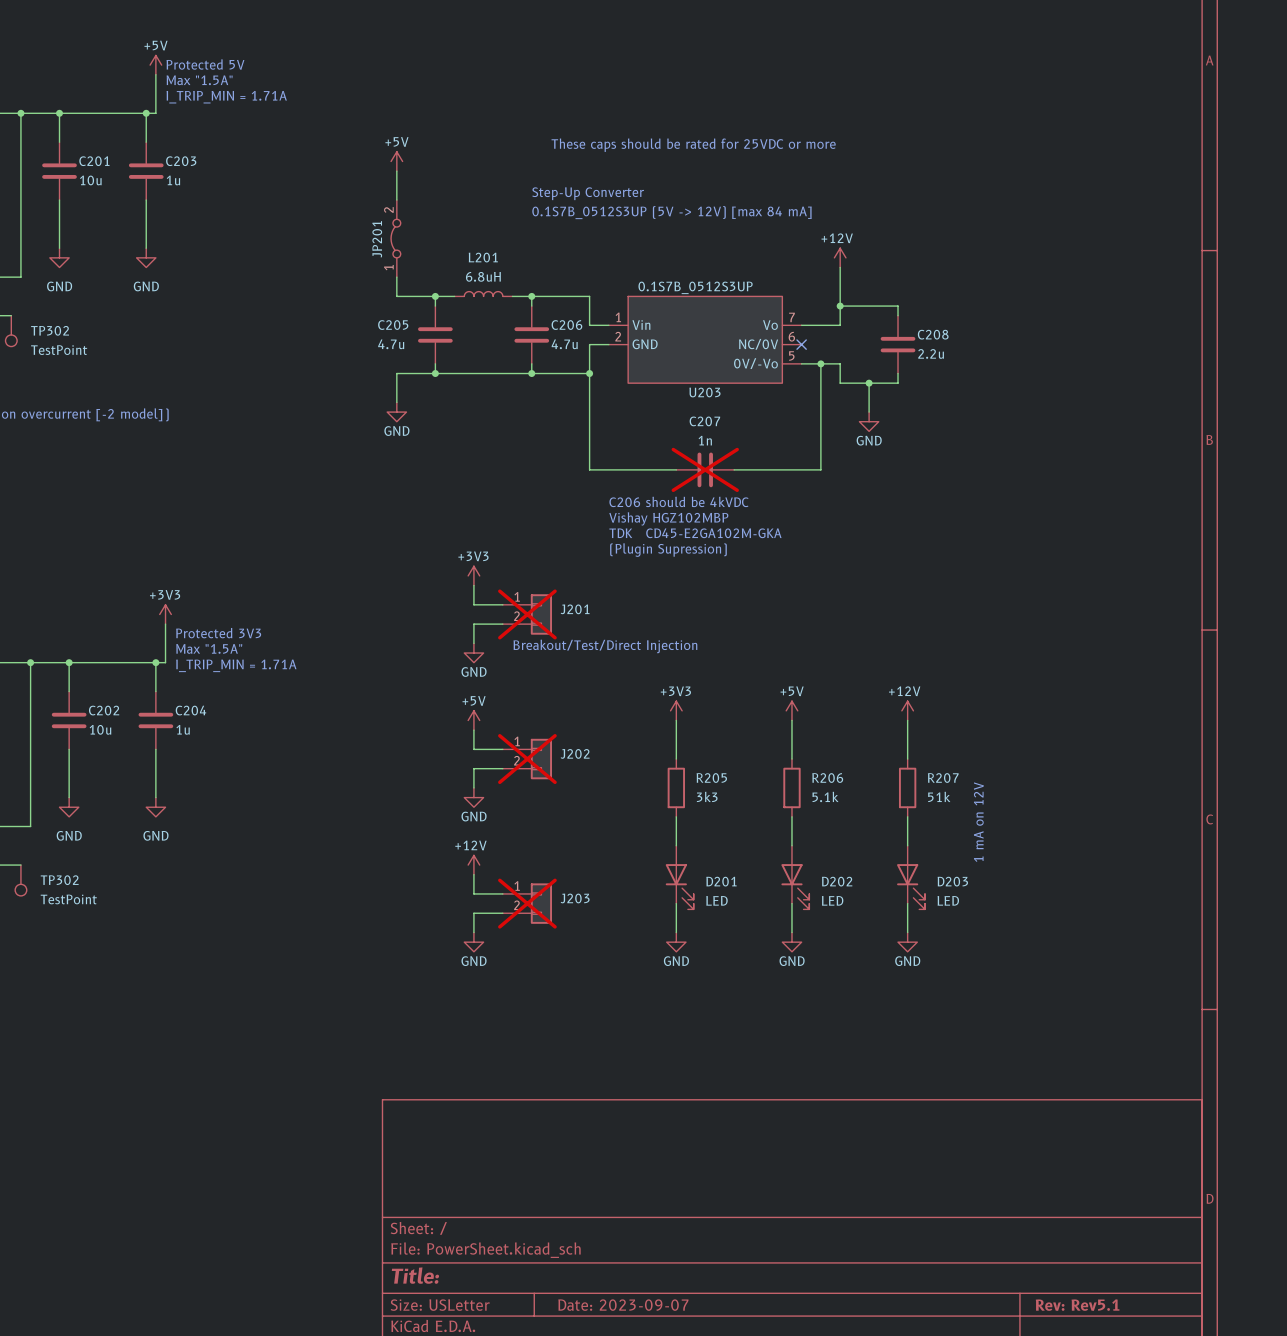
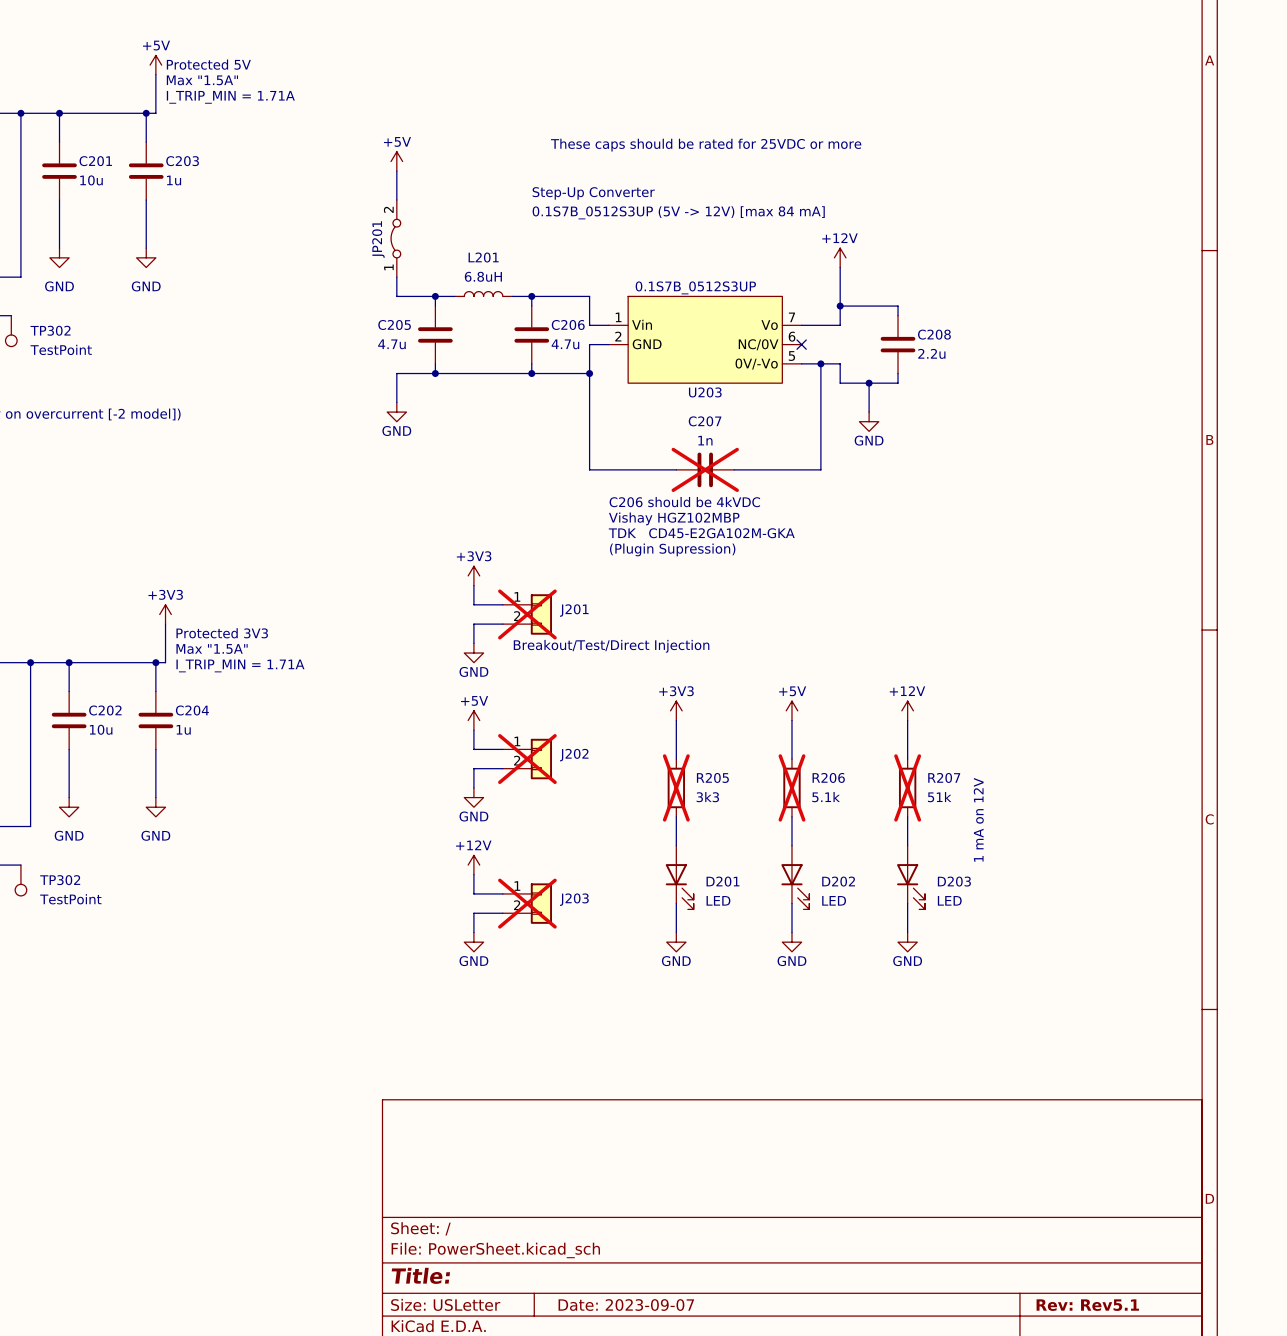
R205 do-not-place cross: none -> (676, 787)
R206 do-not-place cross: none -> (791, 787)
R207 do-not-place cross: none -> (907, 787)

